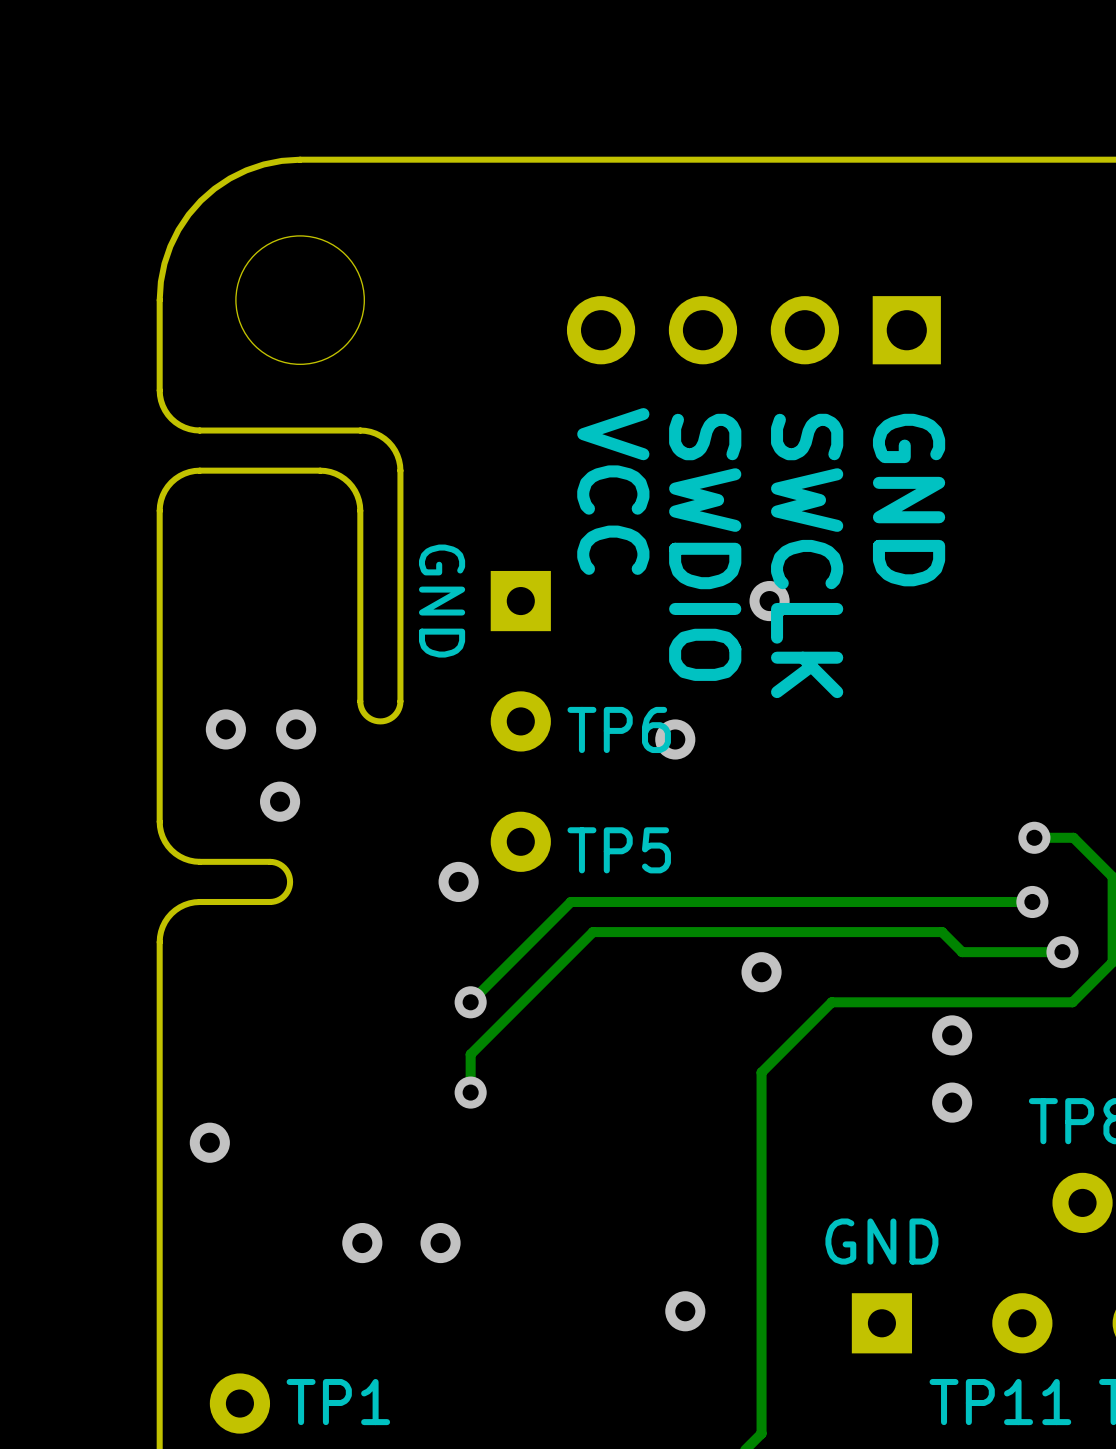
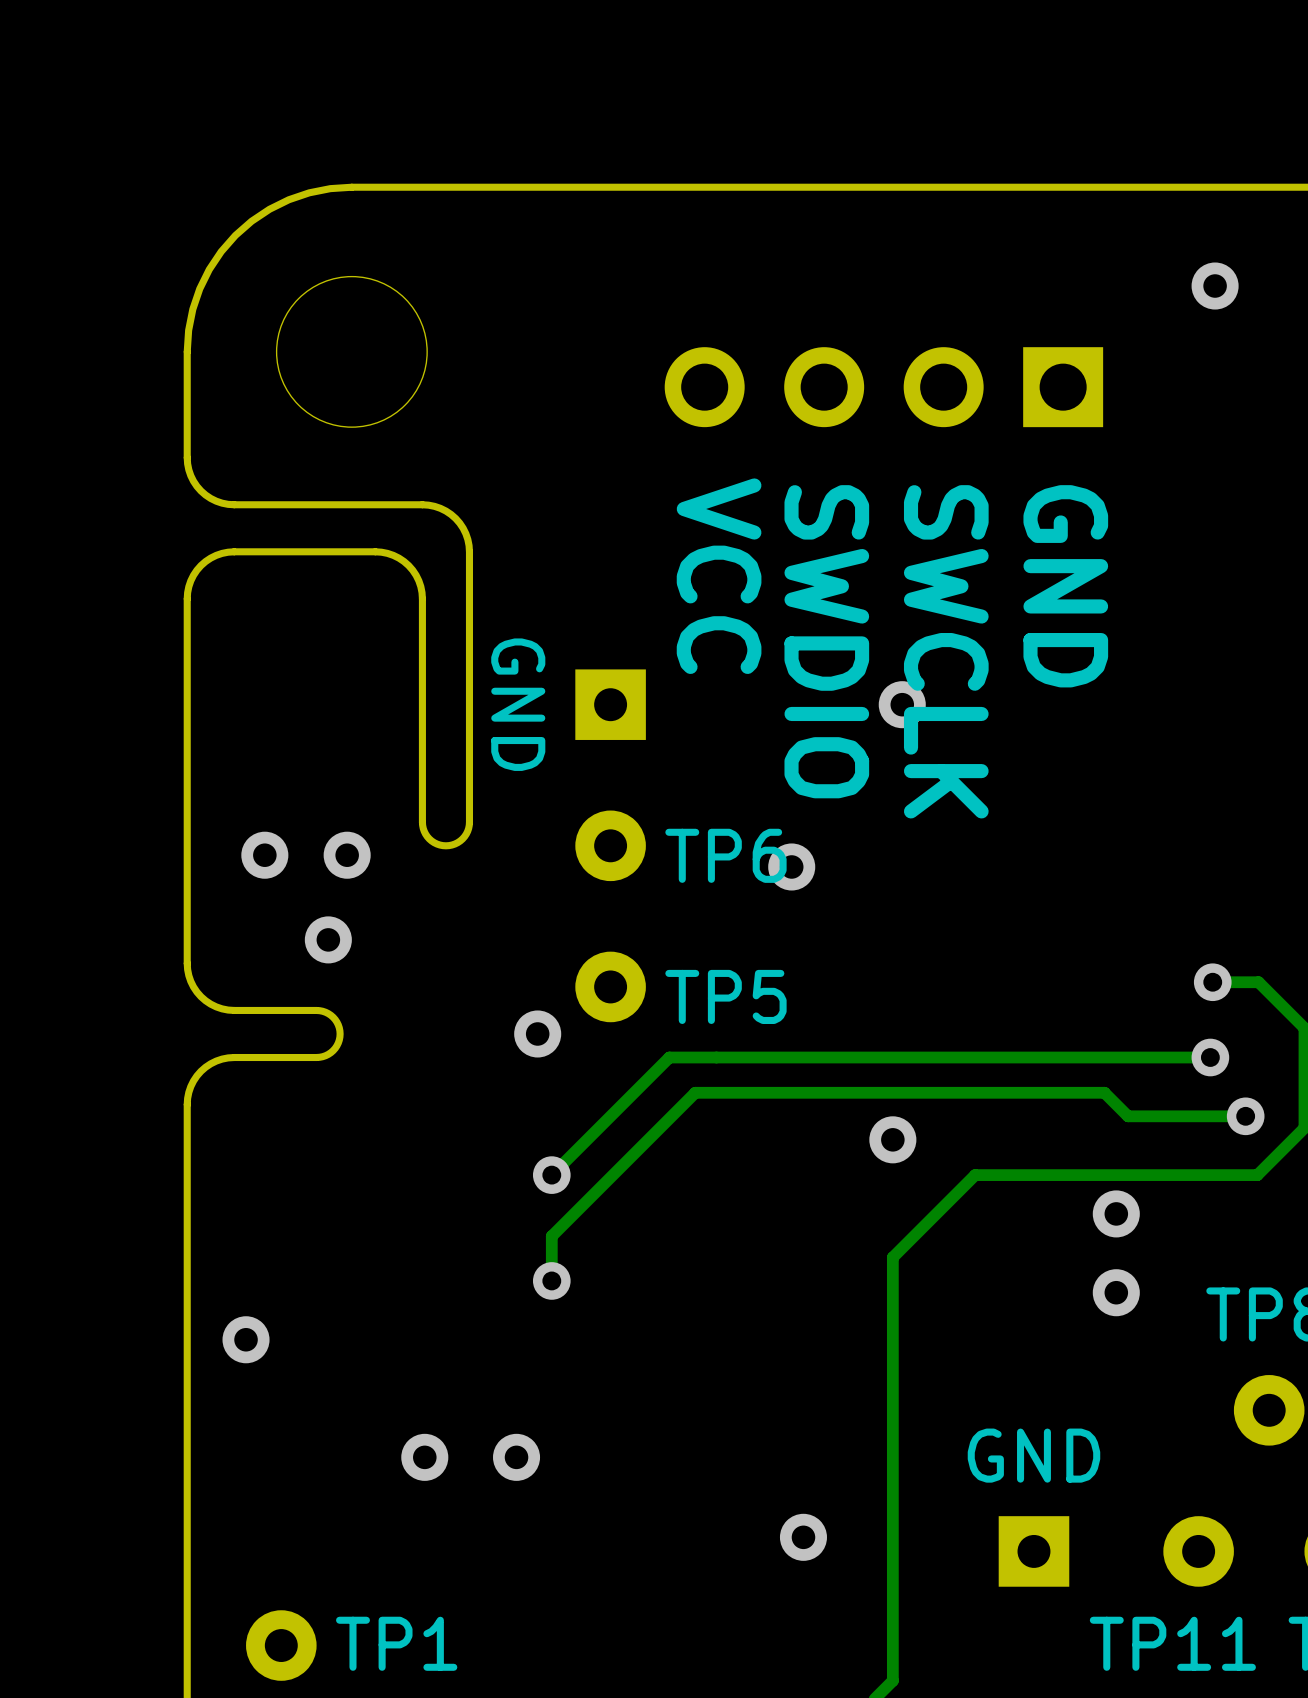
via: none -> (1215, 286)

